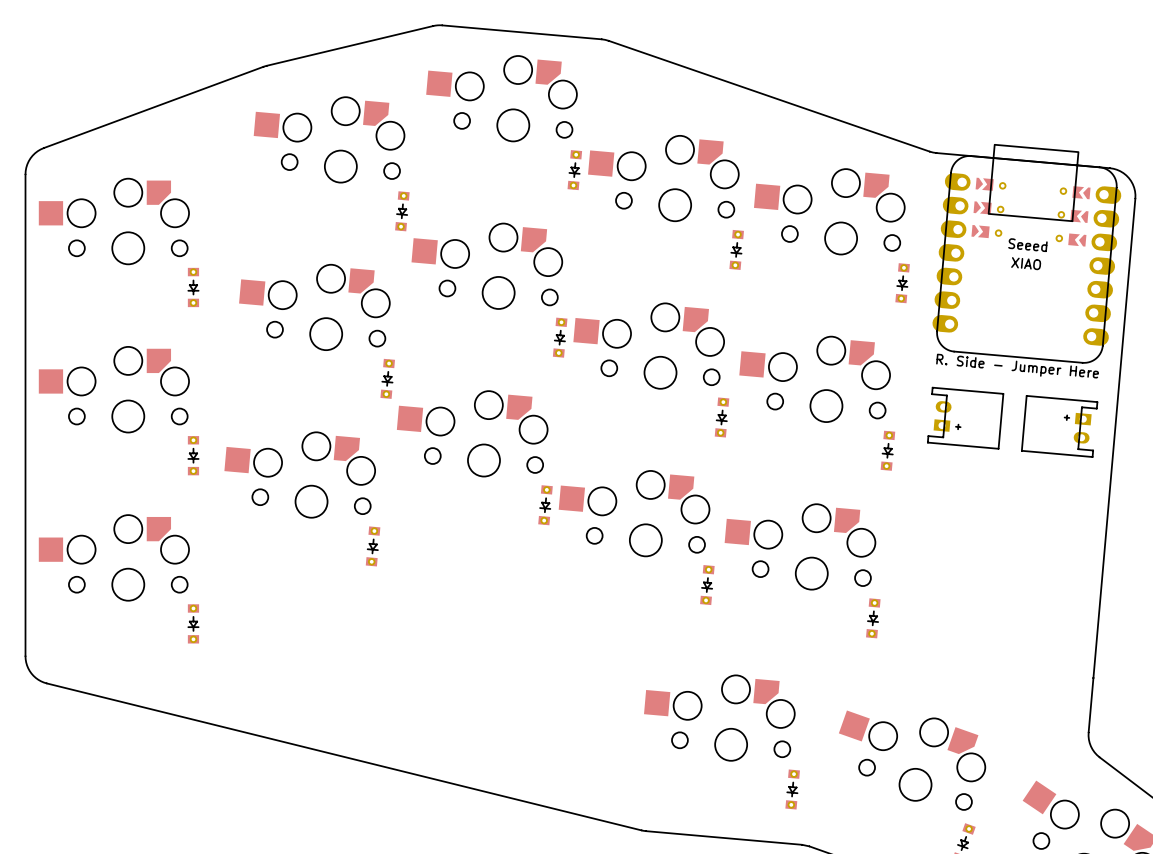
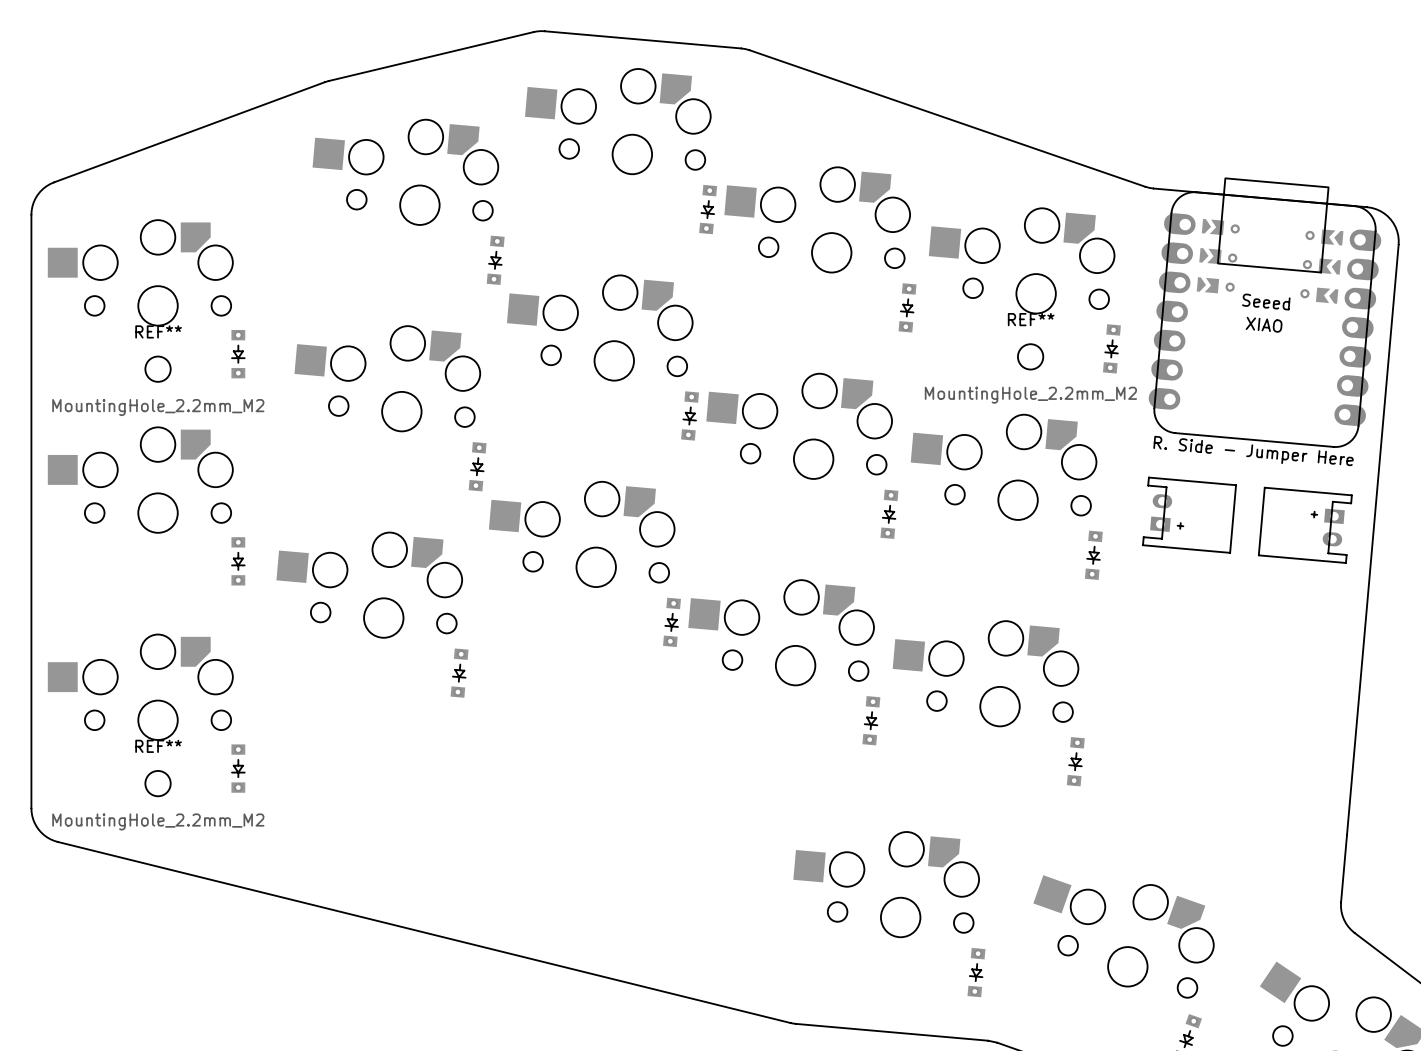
REF**: none -> MountingHole_2.2mm_M2 (1030, 356)
REF**: none -> MountingHole_2.2mm_M2 (158, 369)
REF**: none -> MountingHole_2.2mm_M2 (158, 783)

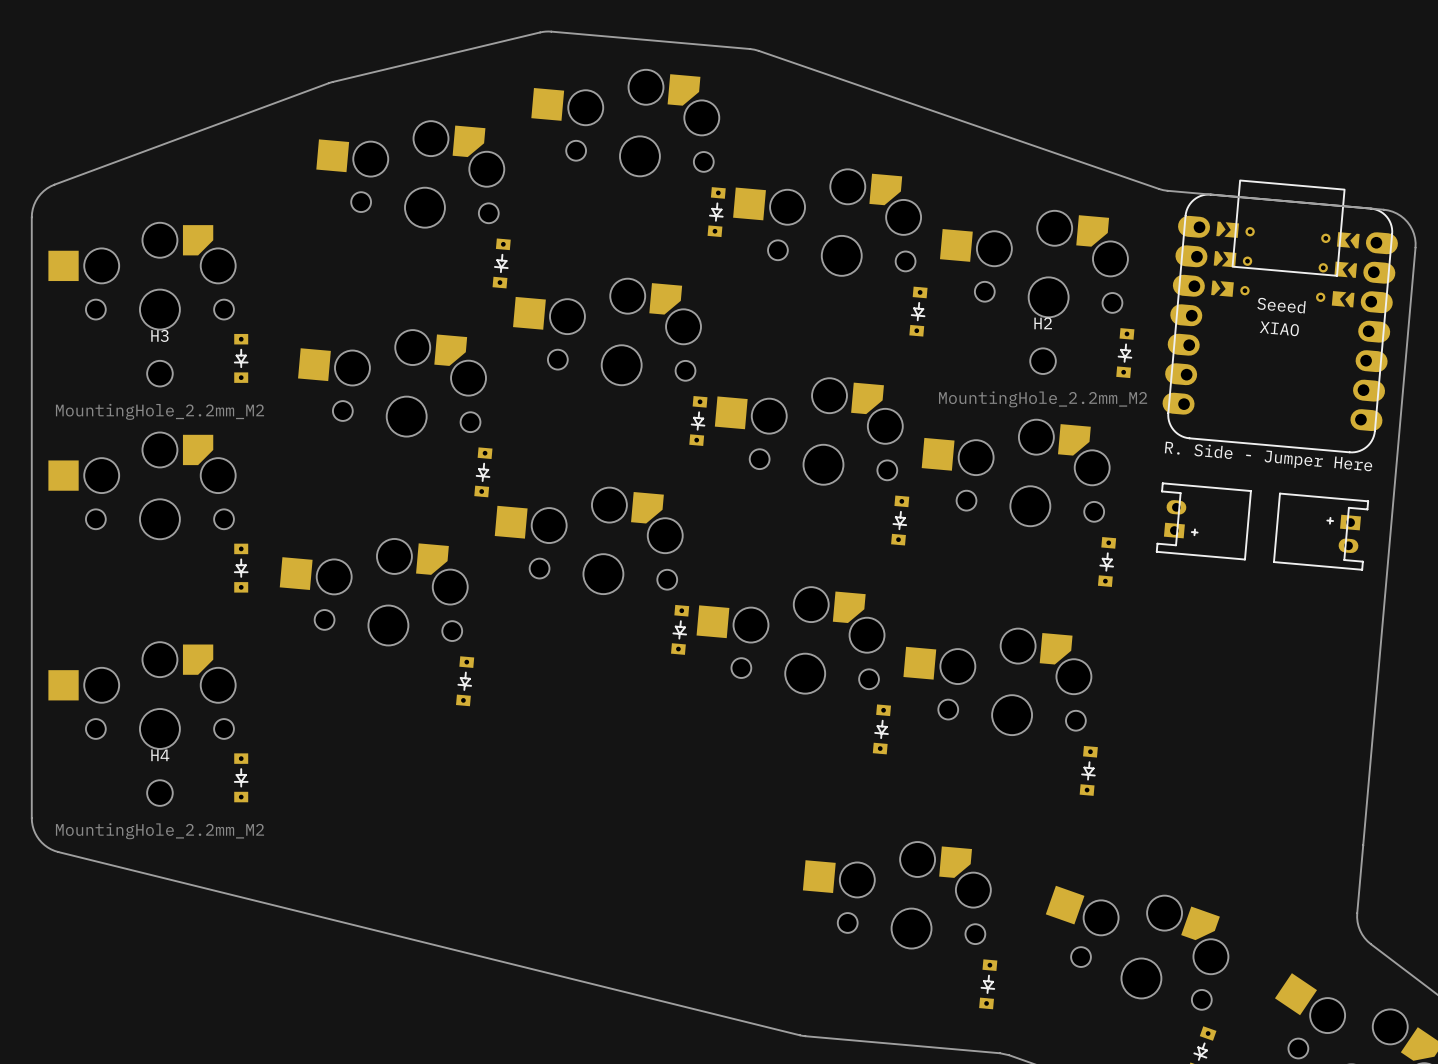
REF** name: REF** (1031, 319) -> H2 (1043, 323)
REF** name: REF** (158, 331) -> H3 (159, 335)
REF** name: REF** (158, 746) -> H4 (160, 755)

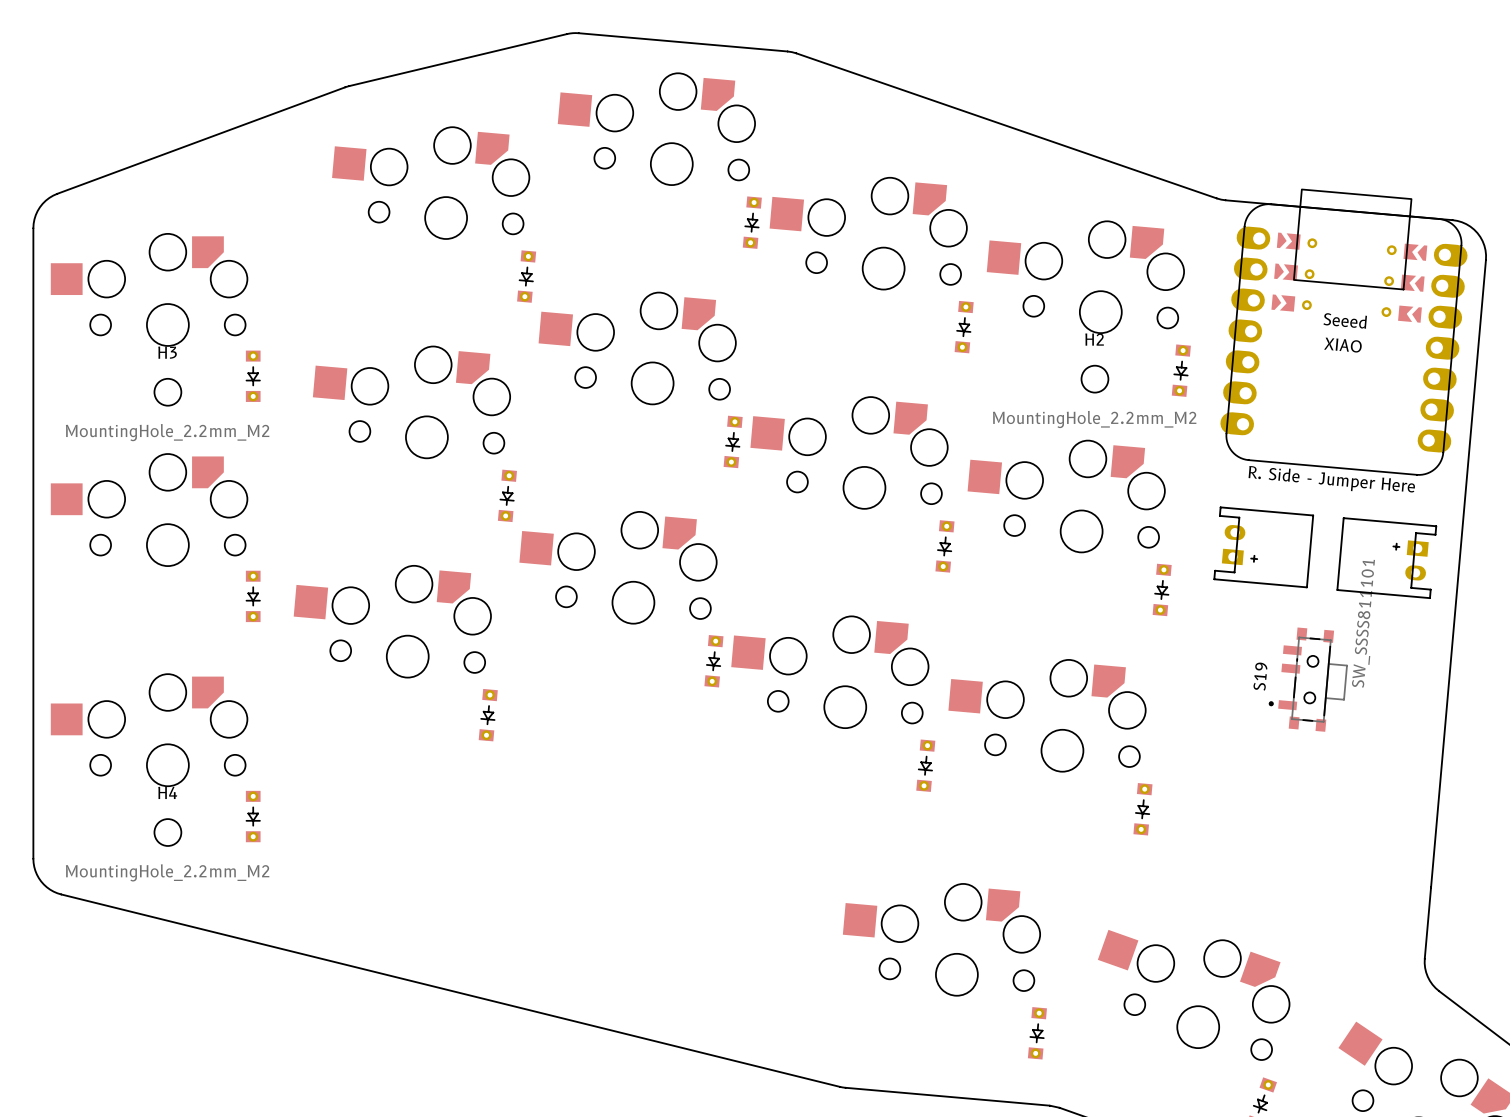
S19: none -> SW_SSSS811101 (1308, 679)

